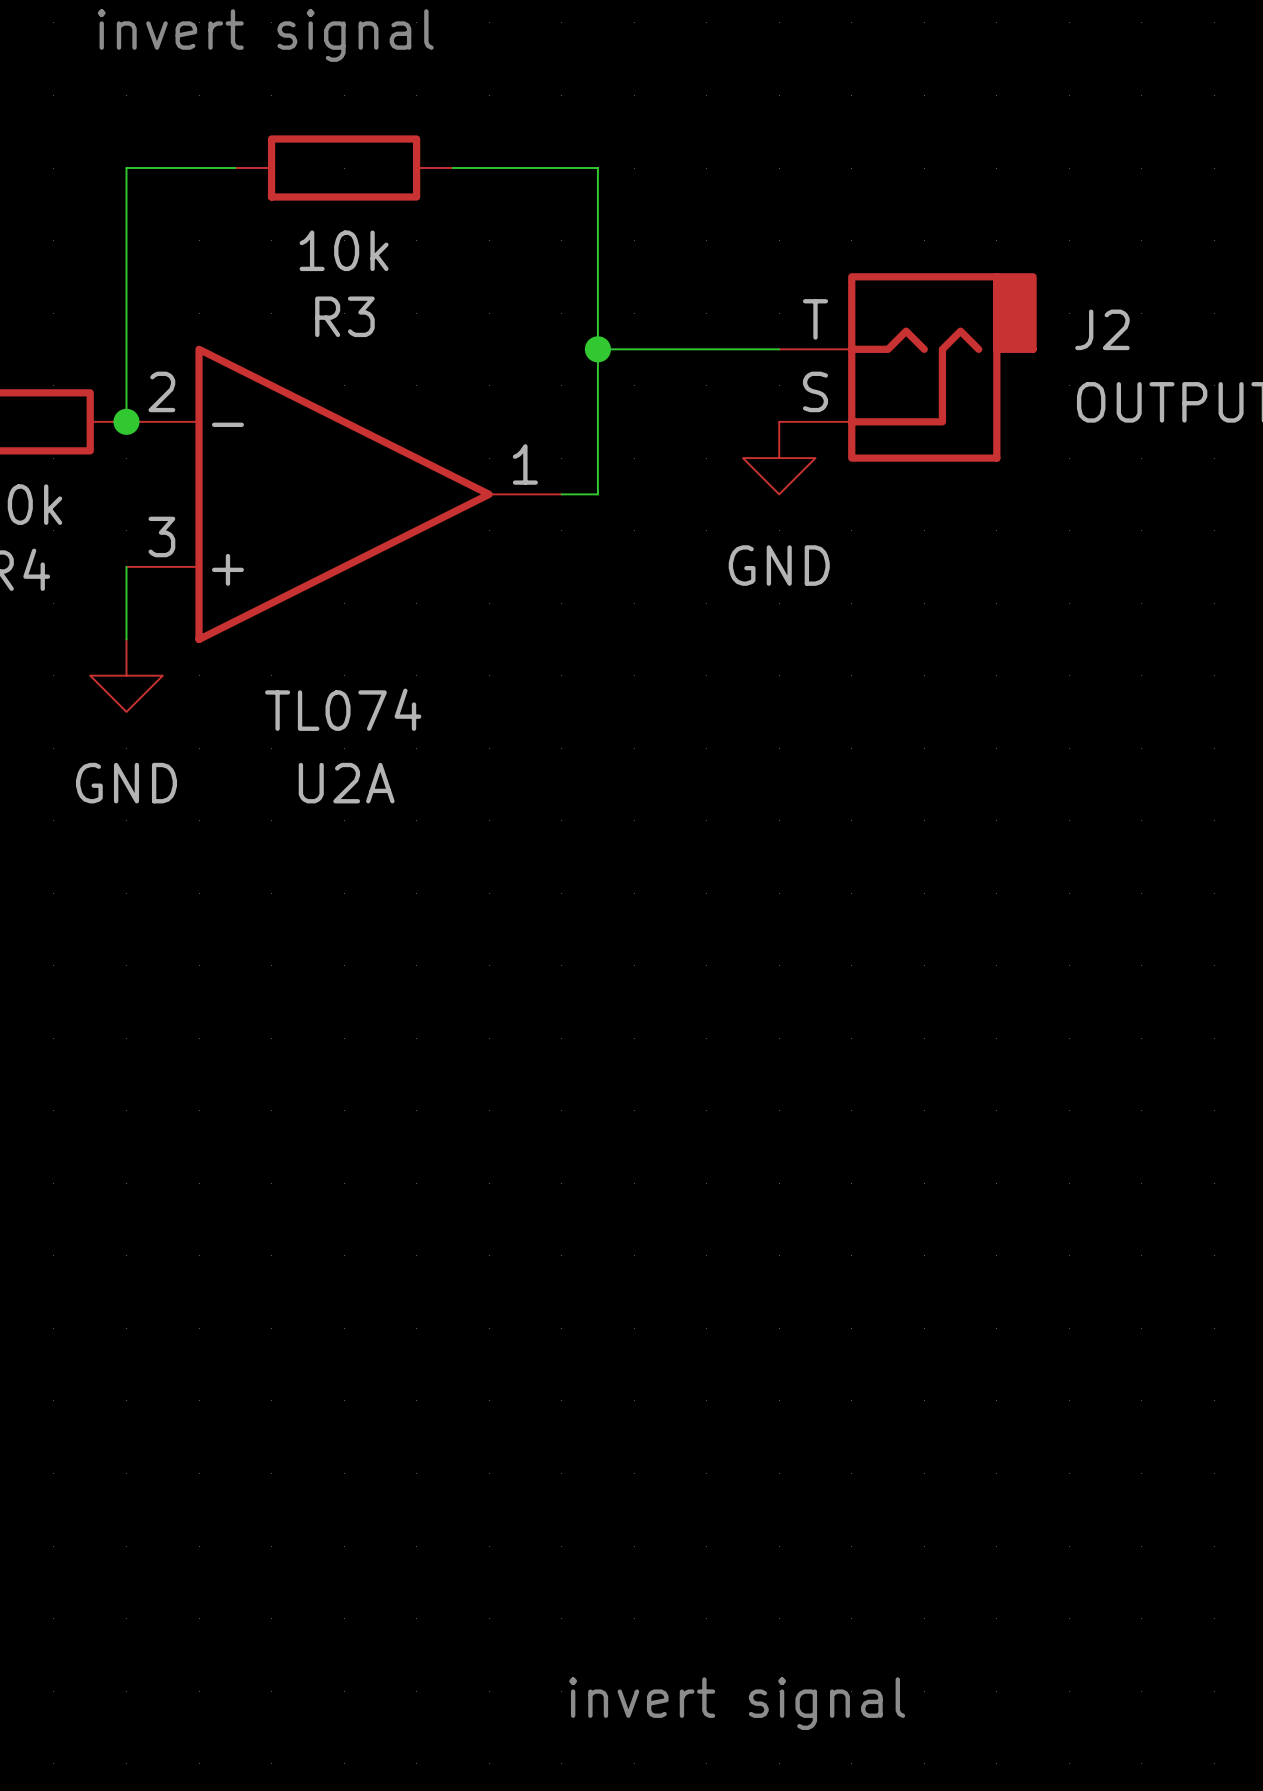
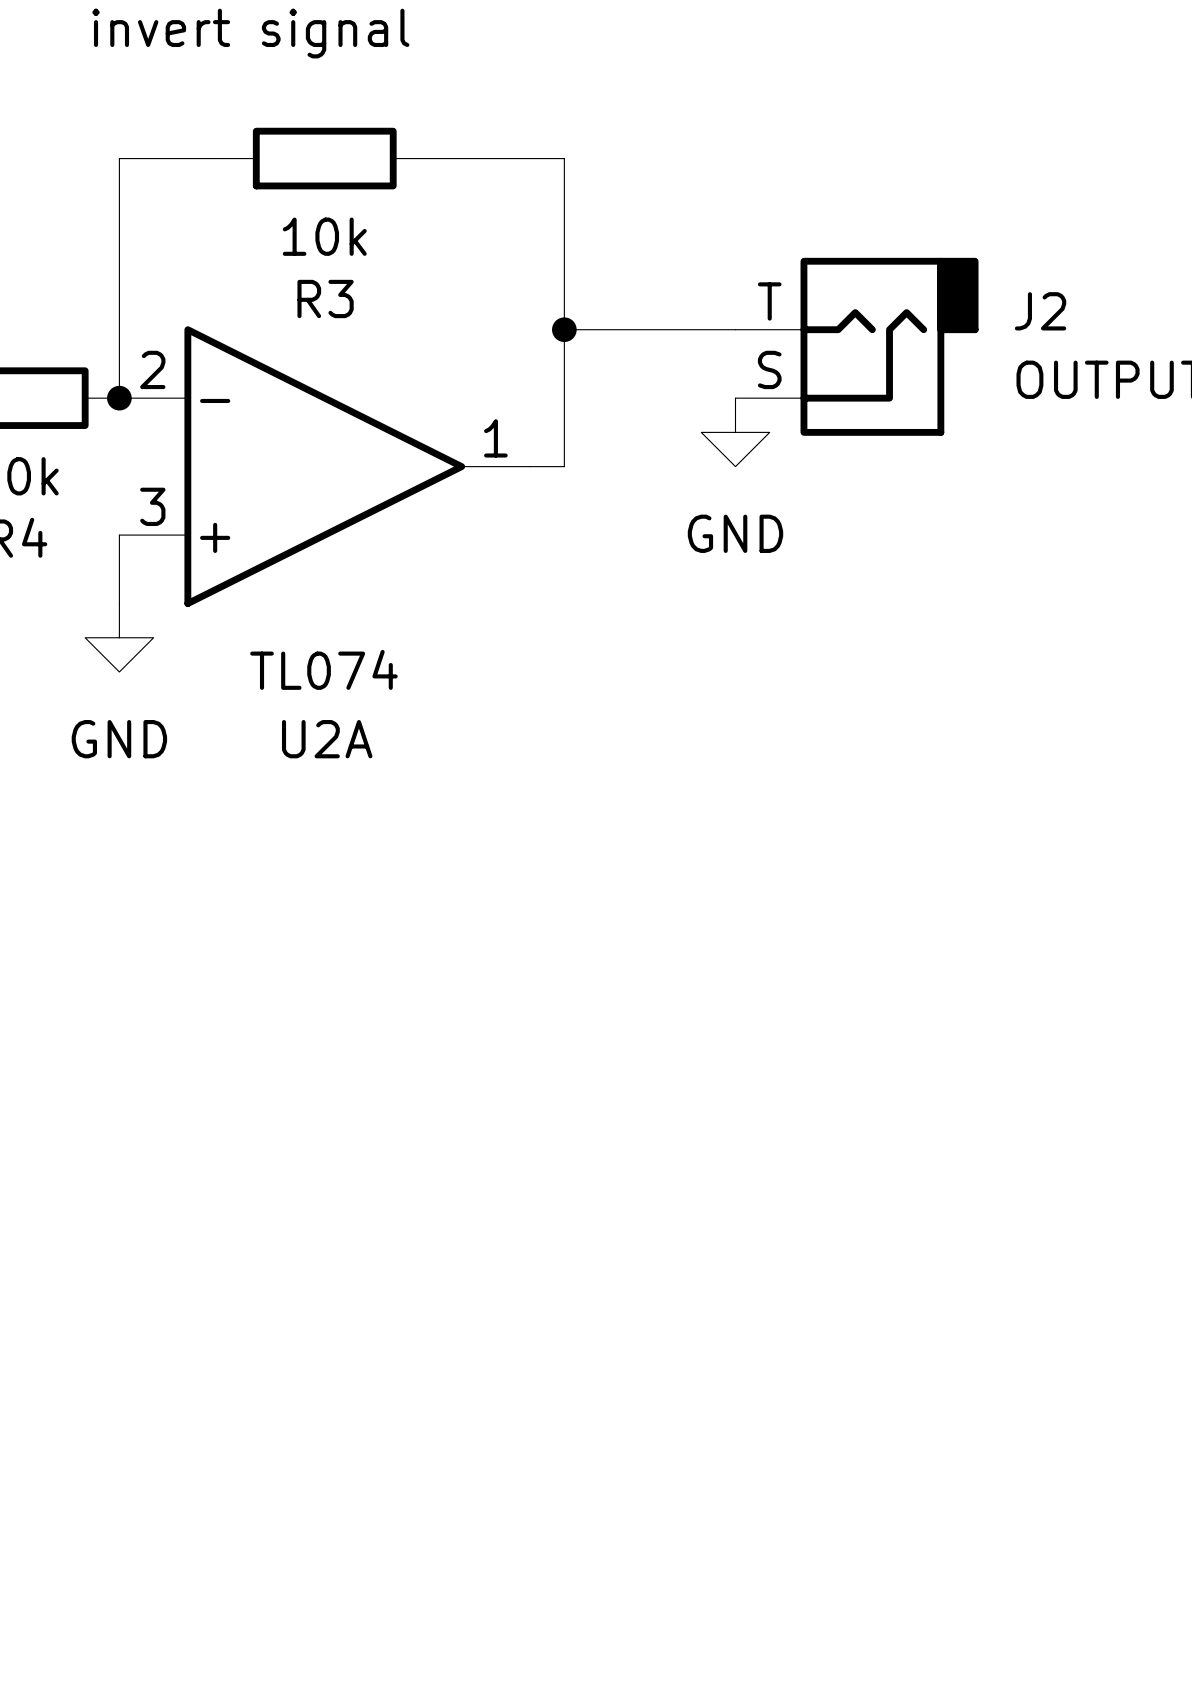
text: invert signal (737, 1703) -> none

